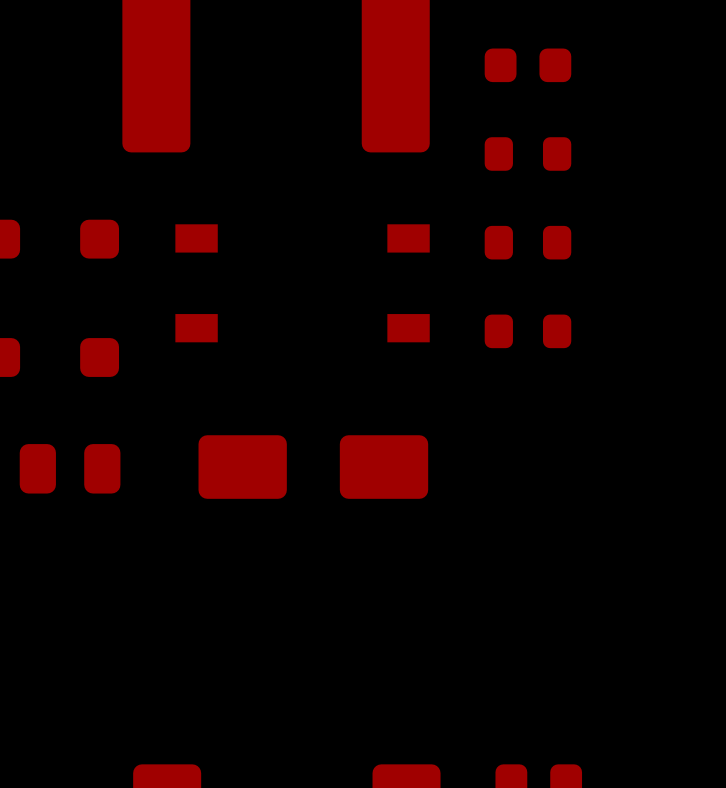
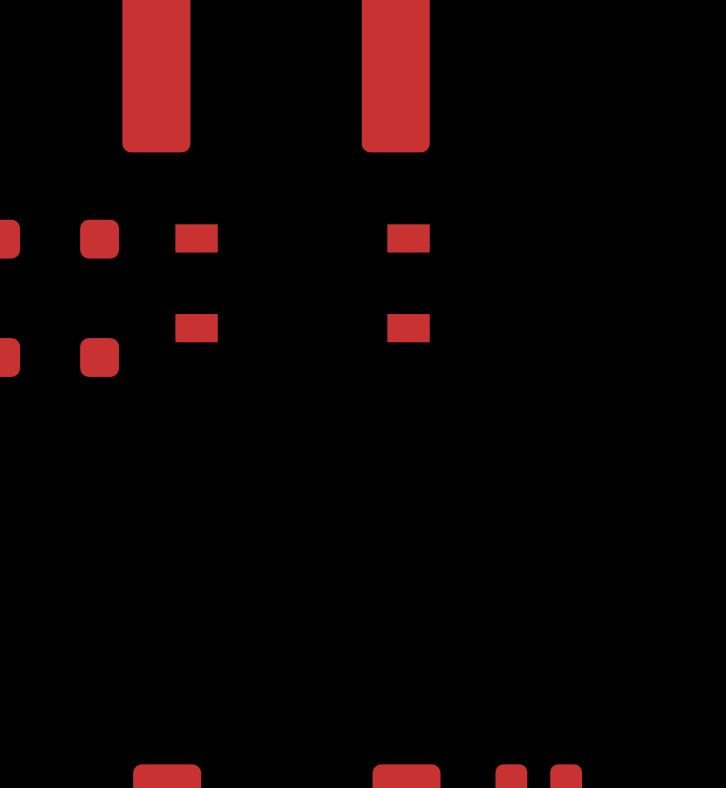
part: (527, 65) -> none
part: (527, 153) -> none
part: (527, 242) -> none
part: (527, 331) -> none
part: (313, 467) -> none
part: (70, 468) -> none

